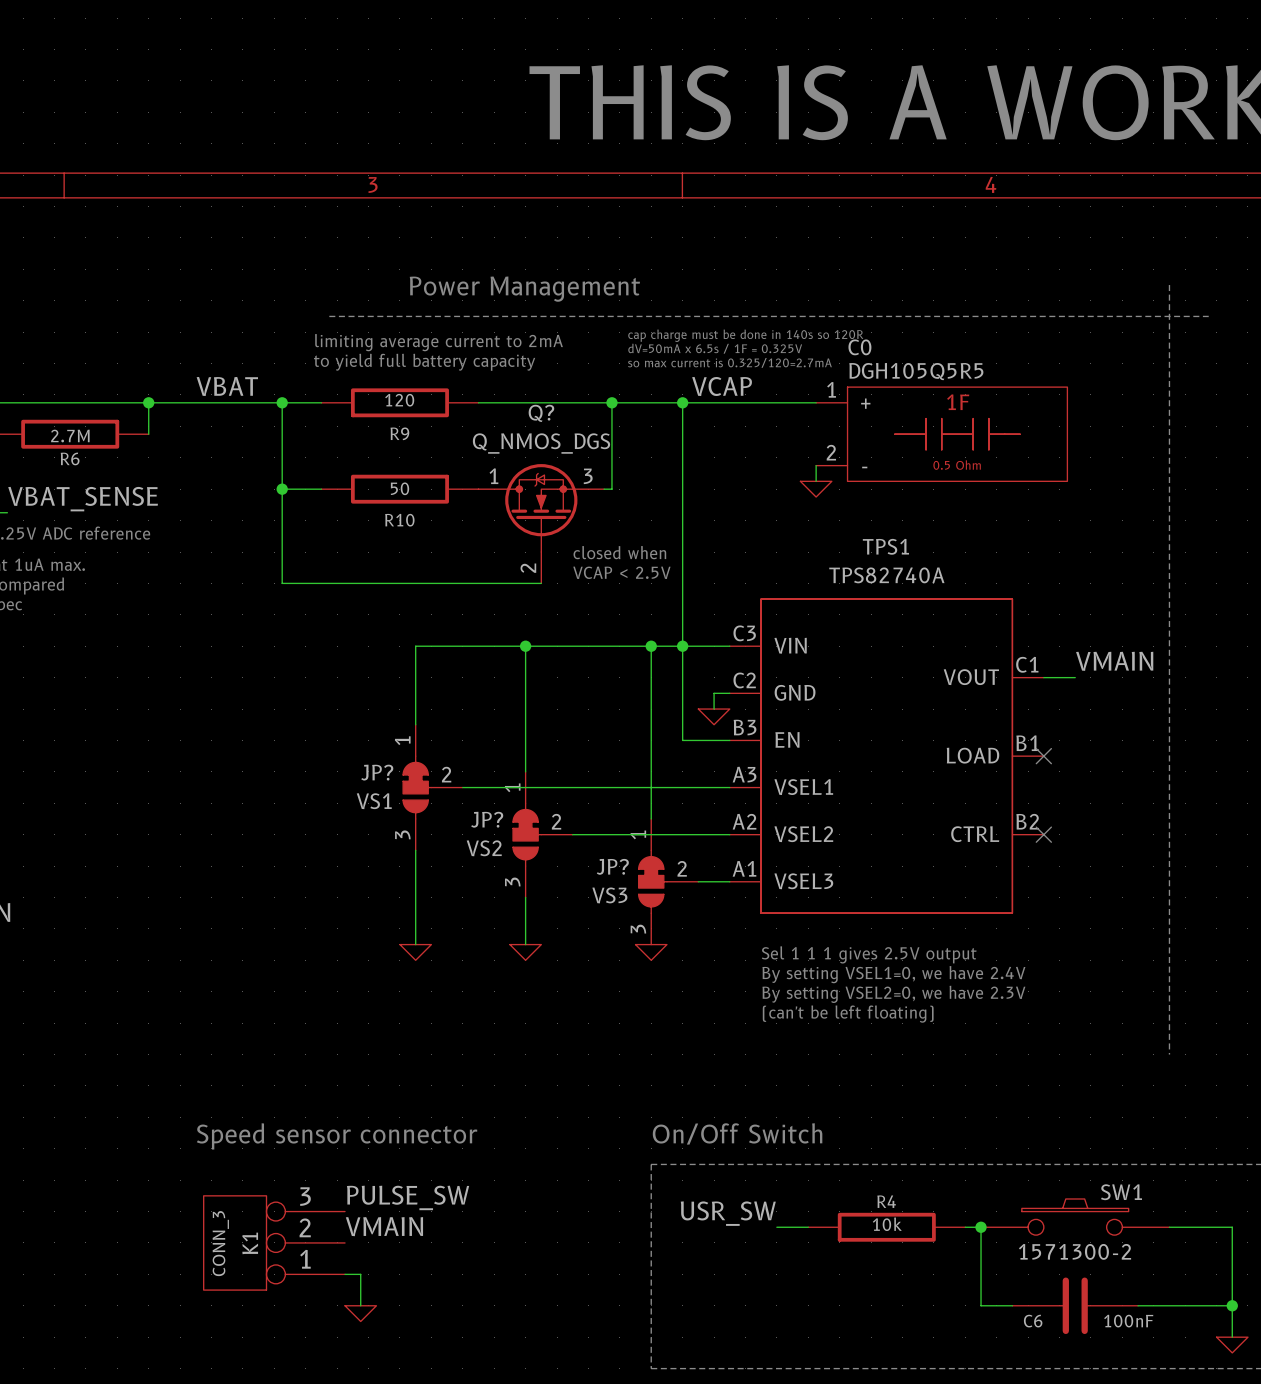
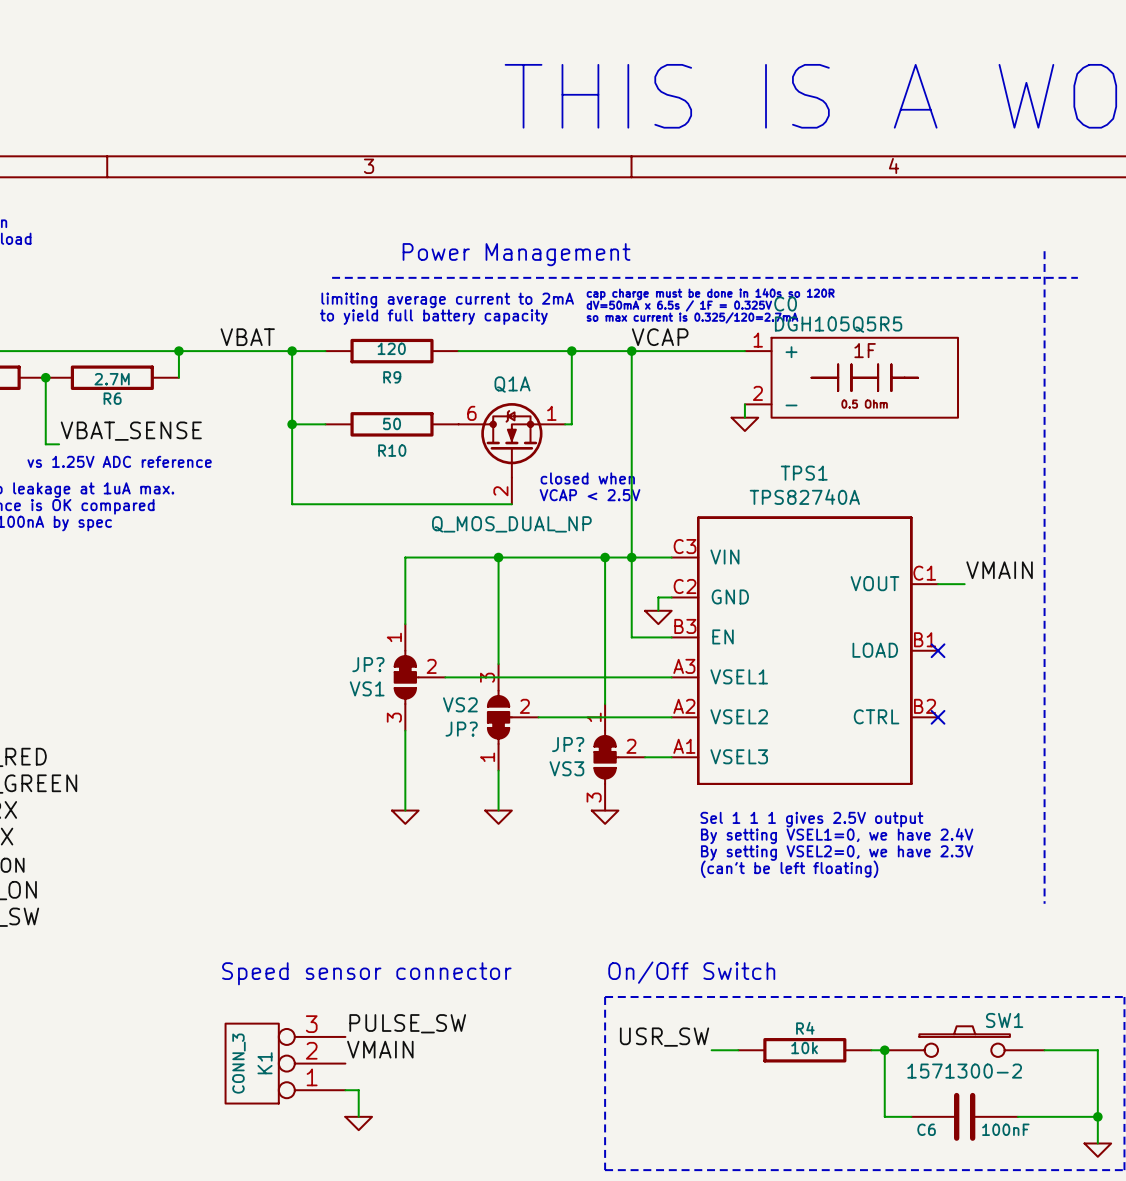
Q? name: Q? (541, 413) -> Q1A (512, 384)
Q? value: Q_NMOS_DGS (541, 443) -> Q_MOS_DUAL_NP (511, 524)
Q? pin number: 1 (493, 476) -> 6 (471, 413)
Q? pin number: 3 (588, 476) -> 1 (551, 413)
JP? flip: as is (527, 834) -> up-down (499, 717)

